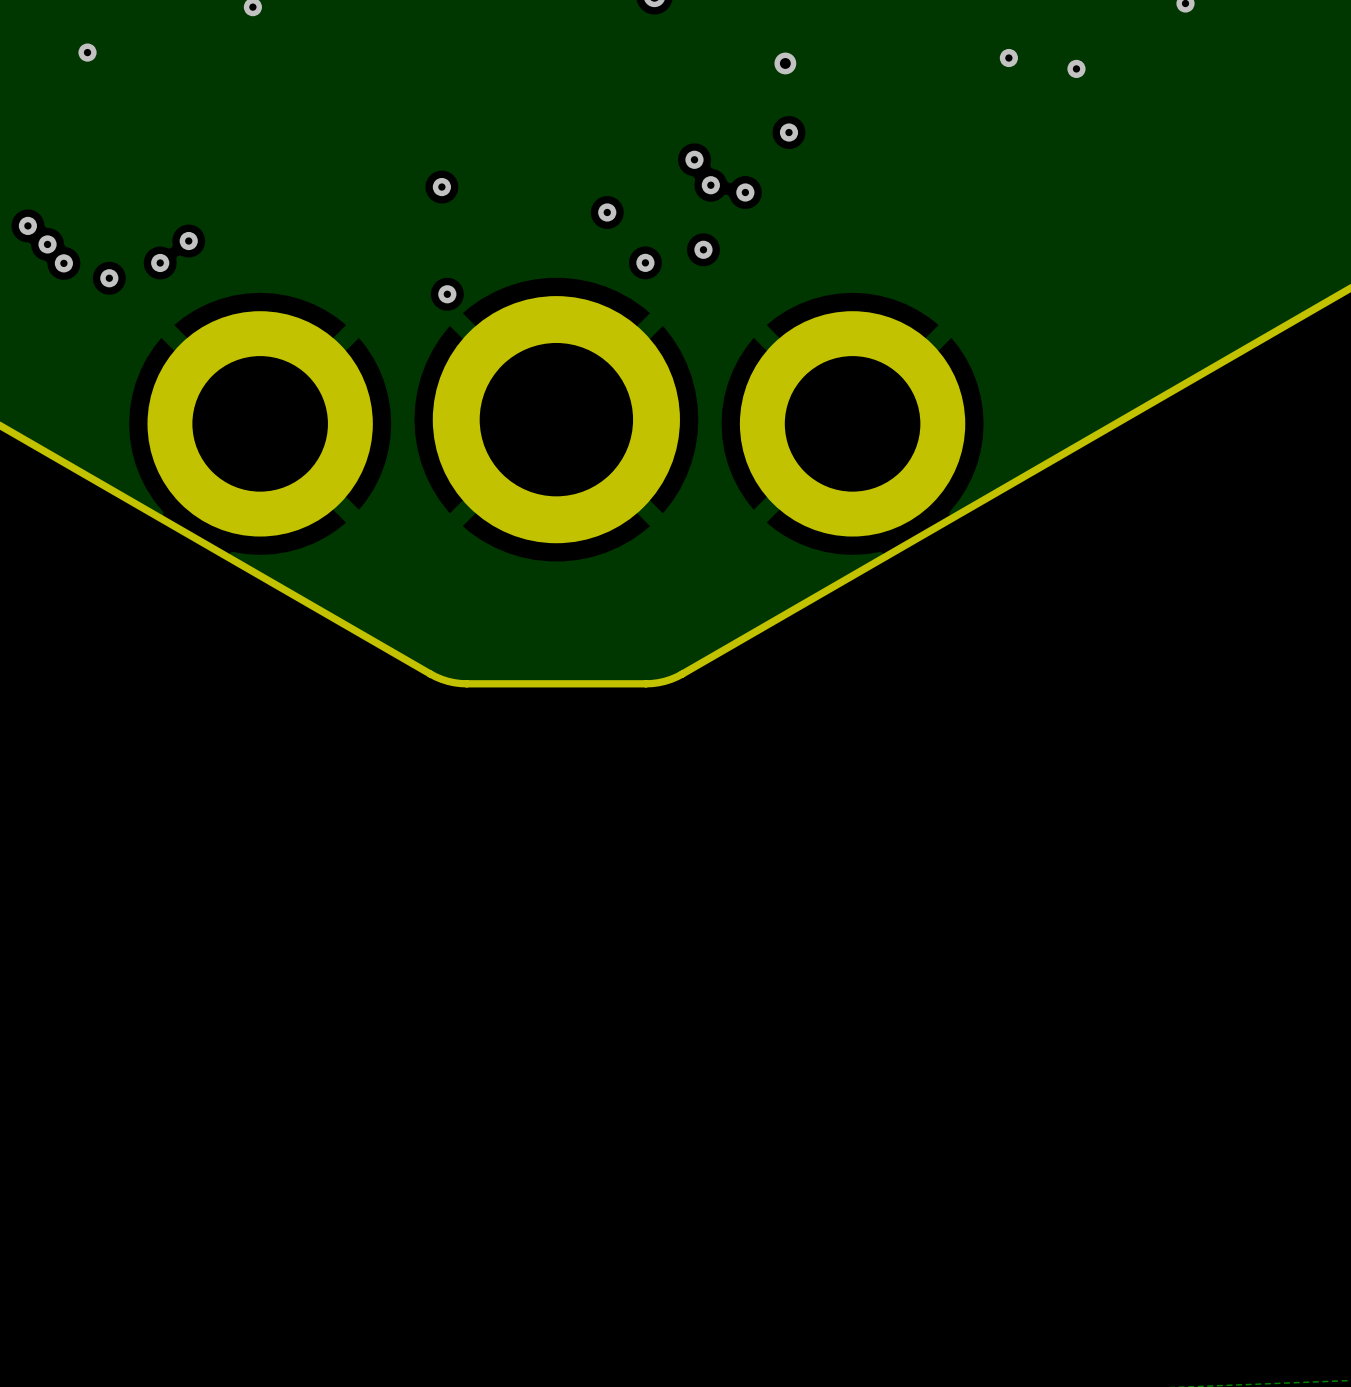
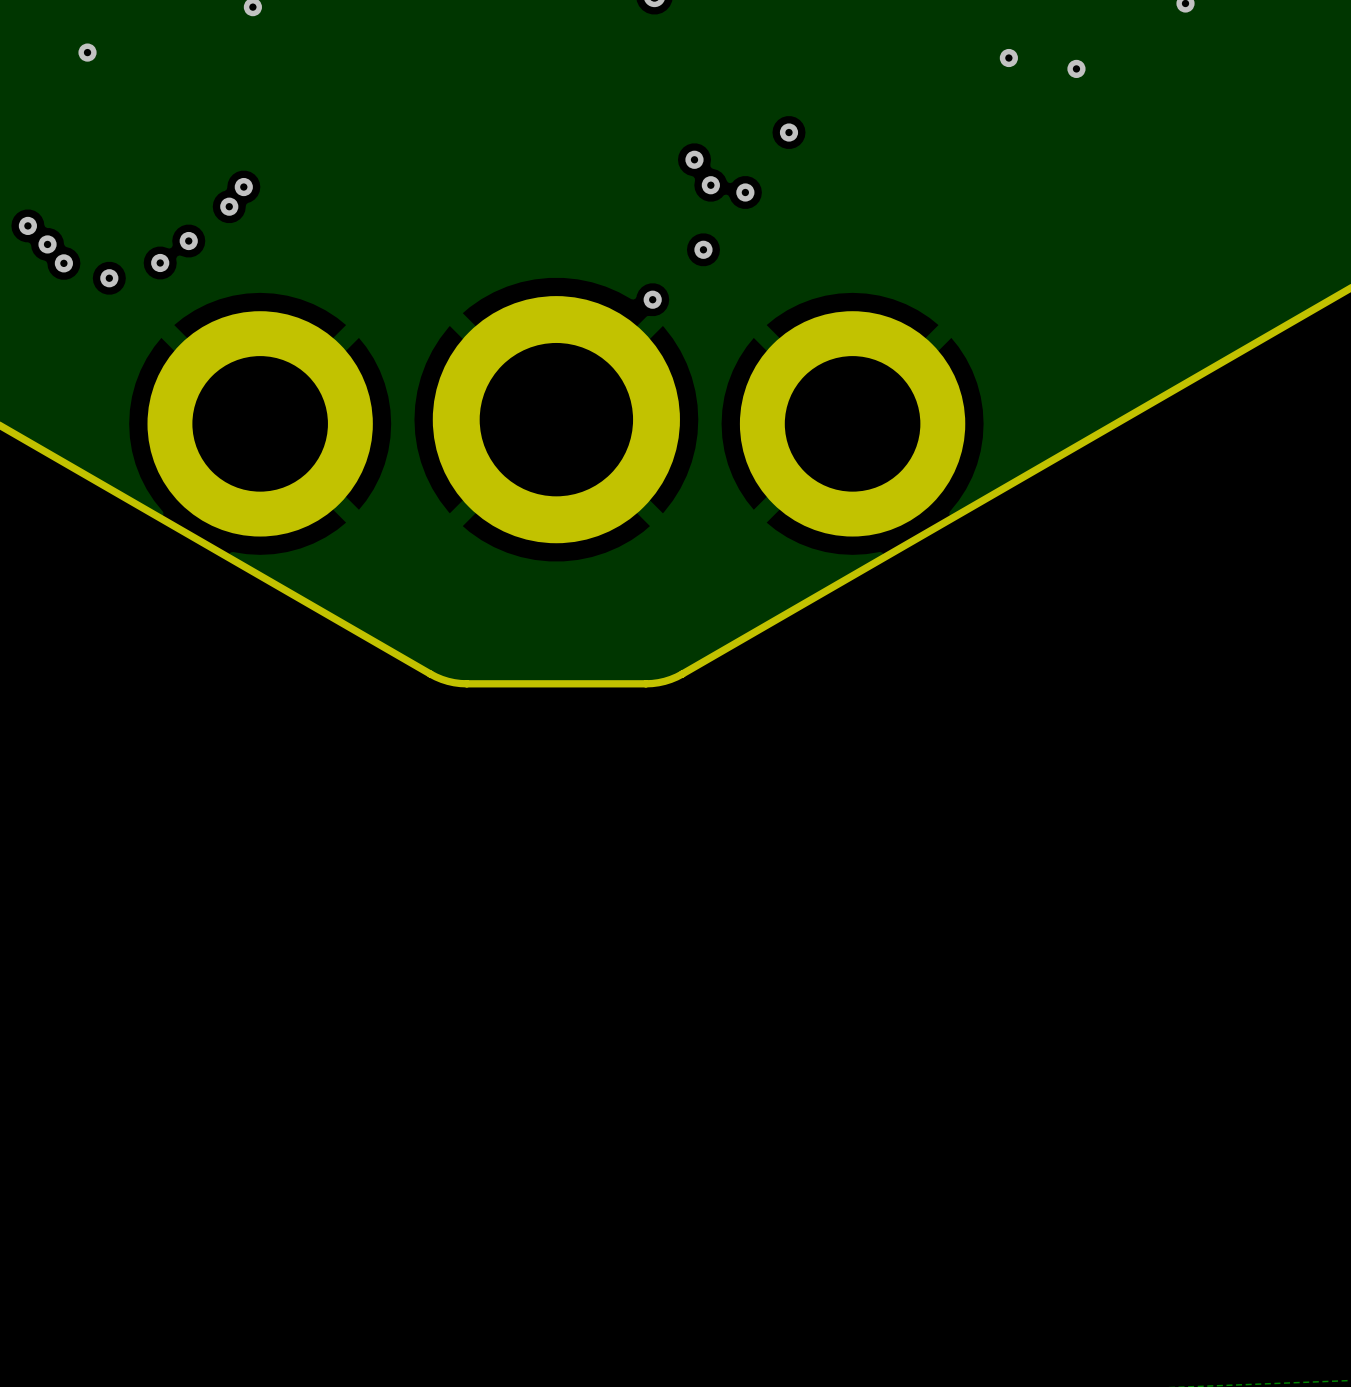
via: (785, 63) -> none
via: none -> (243, 187)
via: (441, 187) -> none
via: none -> (229, 206)
via: (607, 212) -> none
via position: (645, 262) -> (652, 299)
via: (447, 294) -> none

